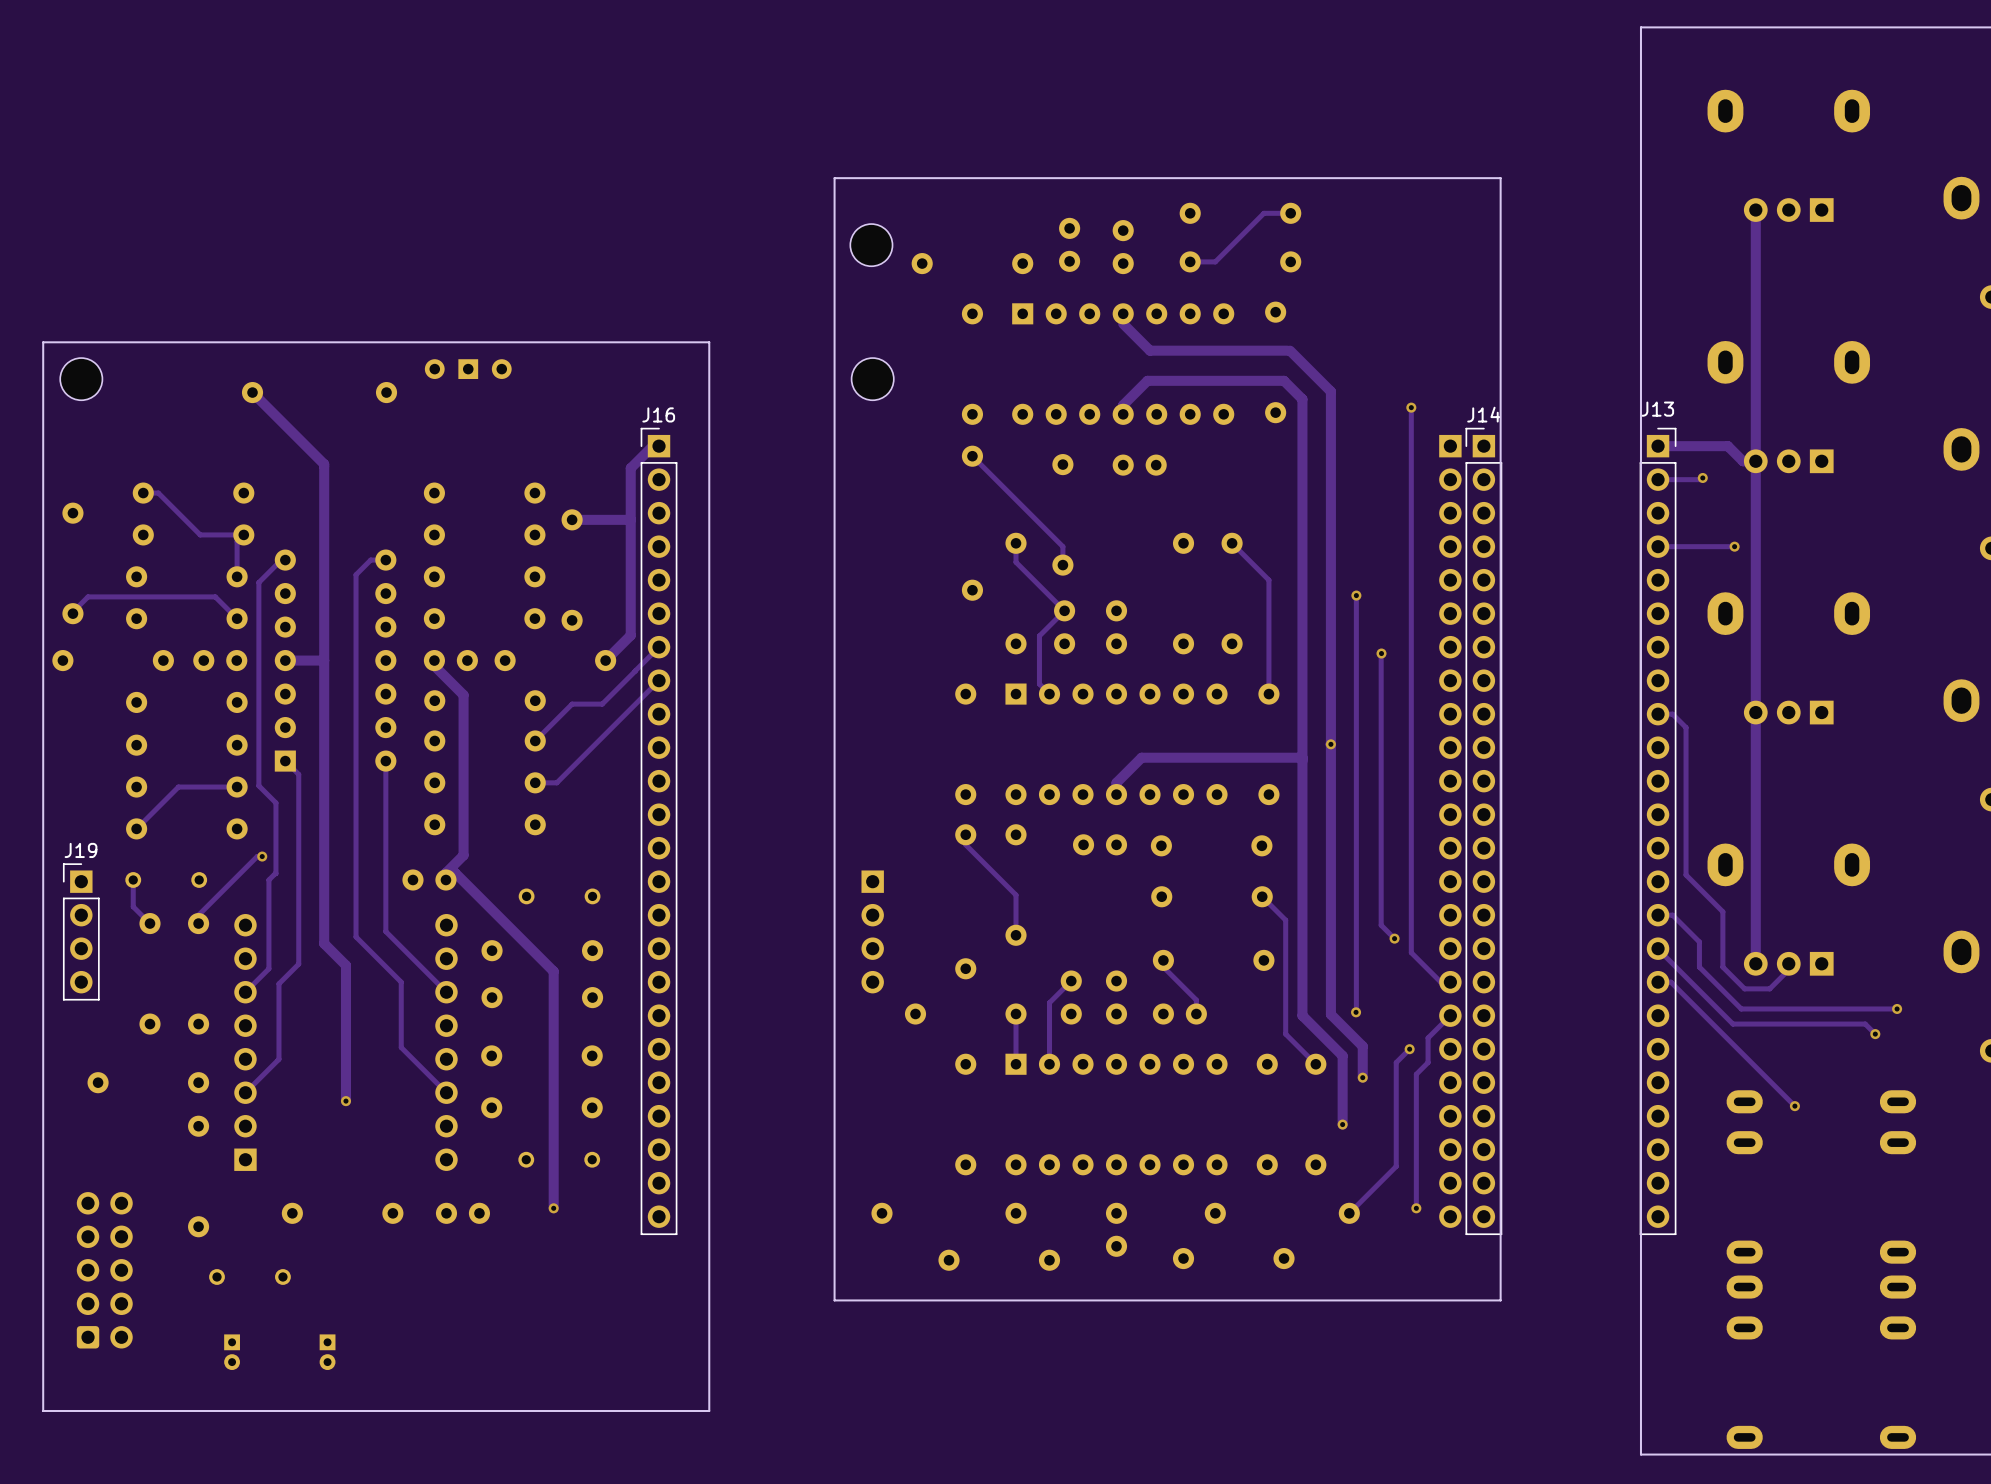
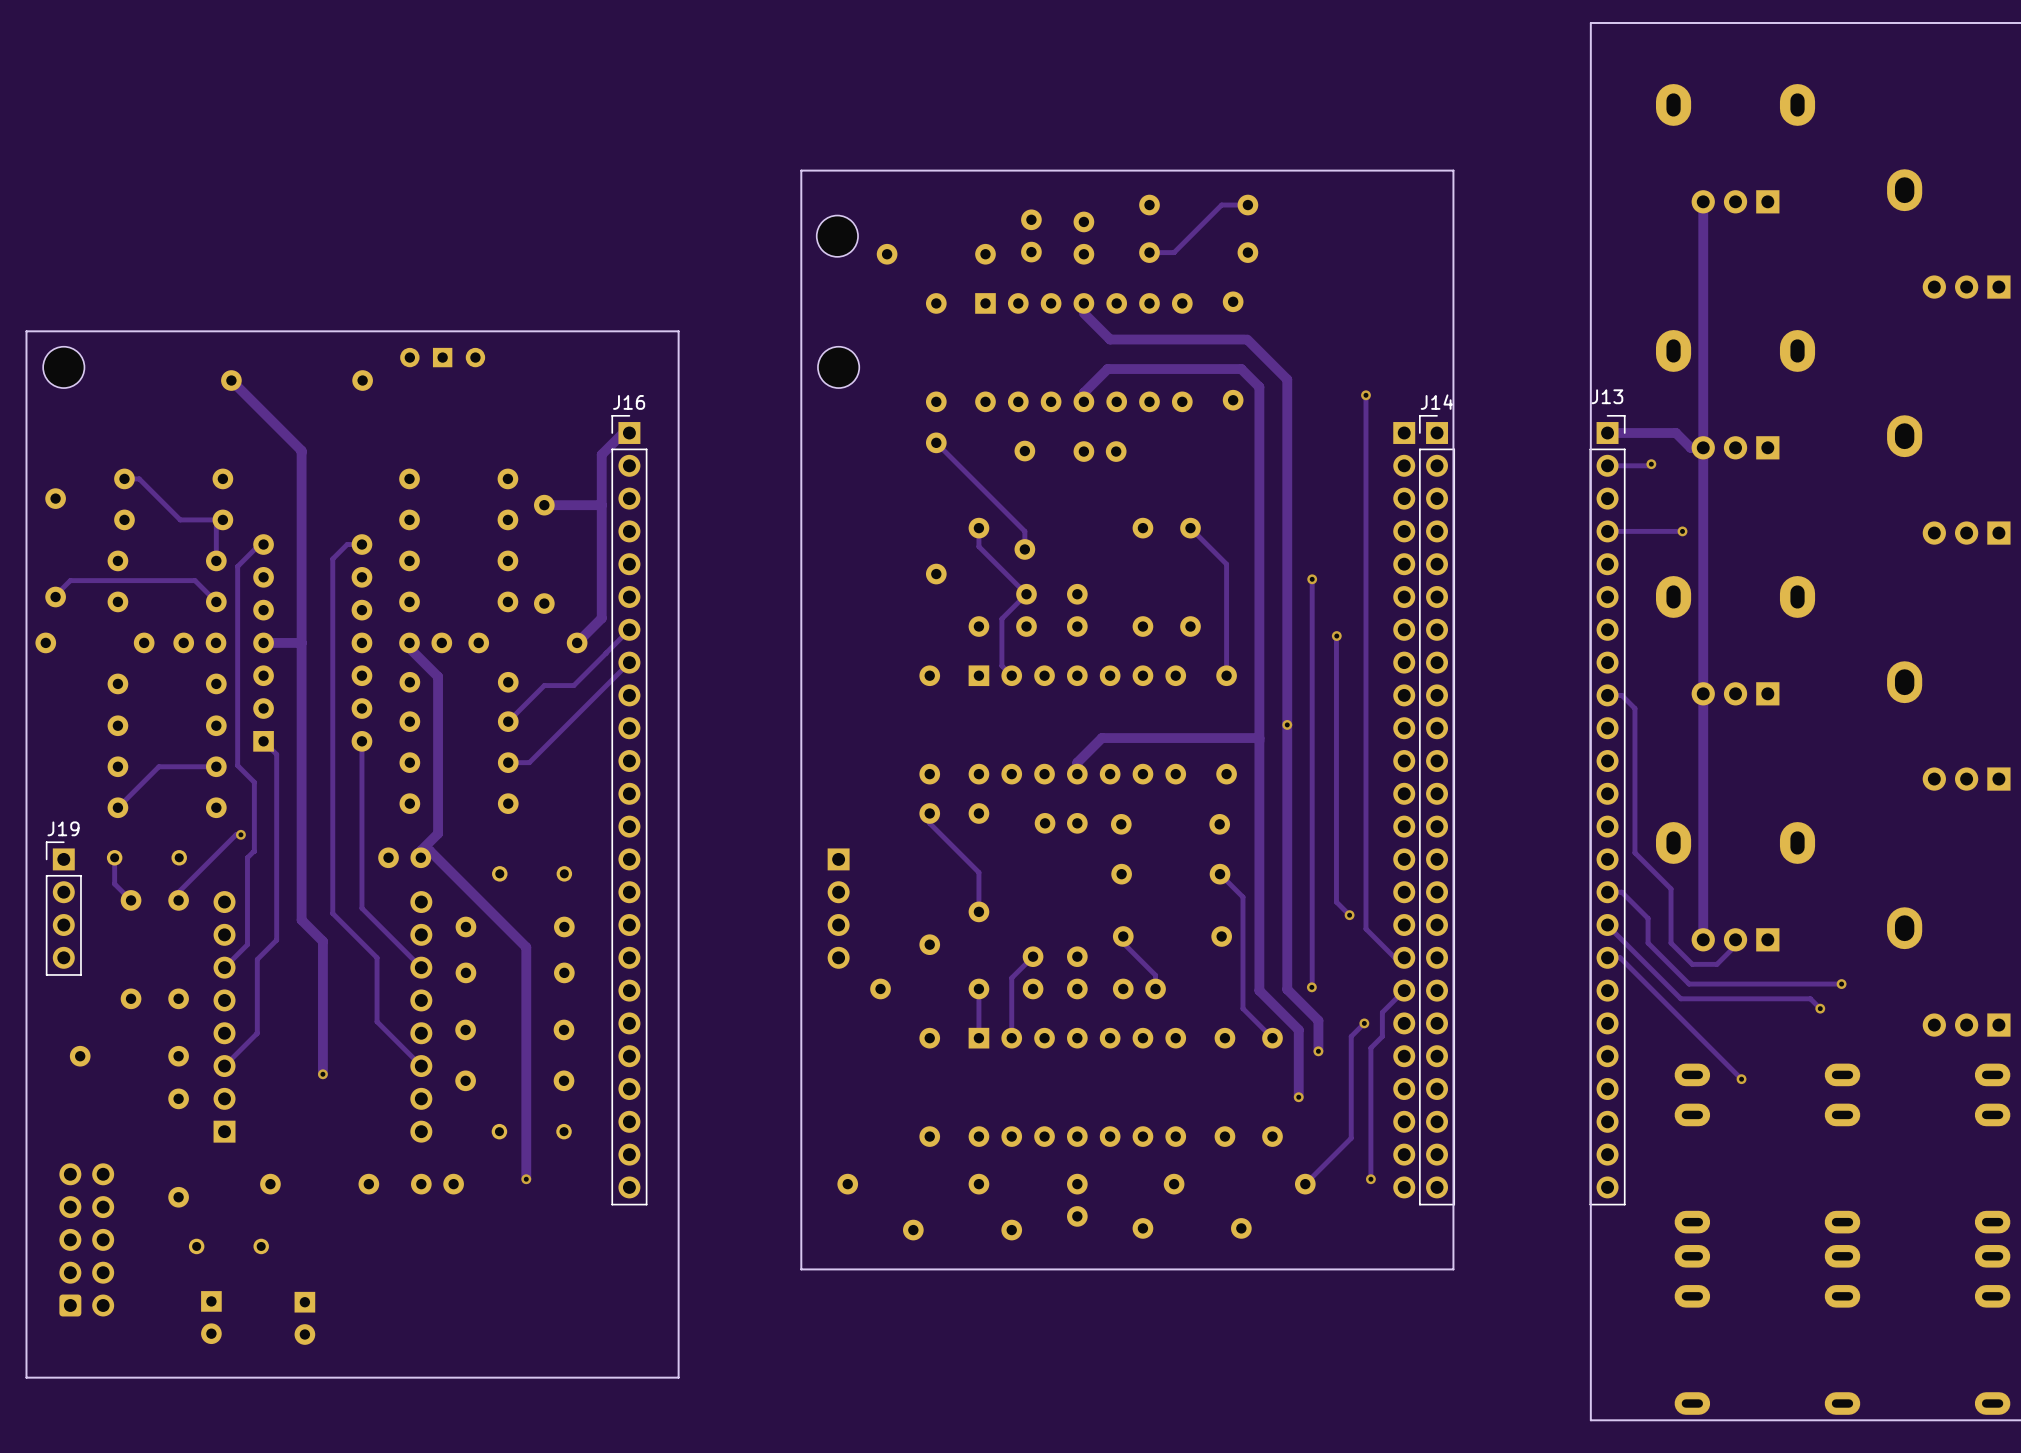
part footprint: [224, 1334, 240, 1371] -> [201, 1291, 222, 1345]
part footprint: [319, 1334, 336, 1371] -> [294, 1291, 316, 1345]

